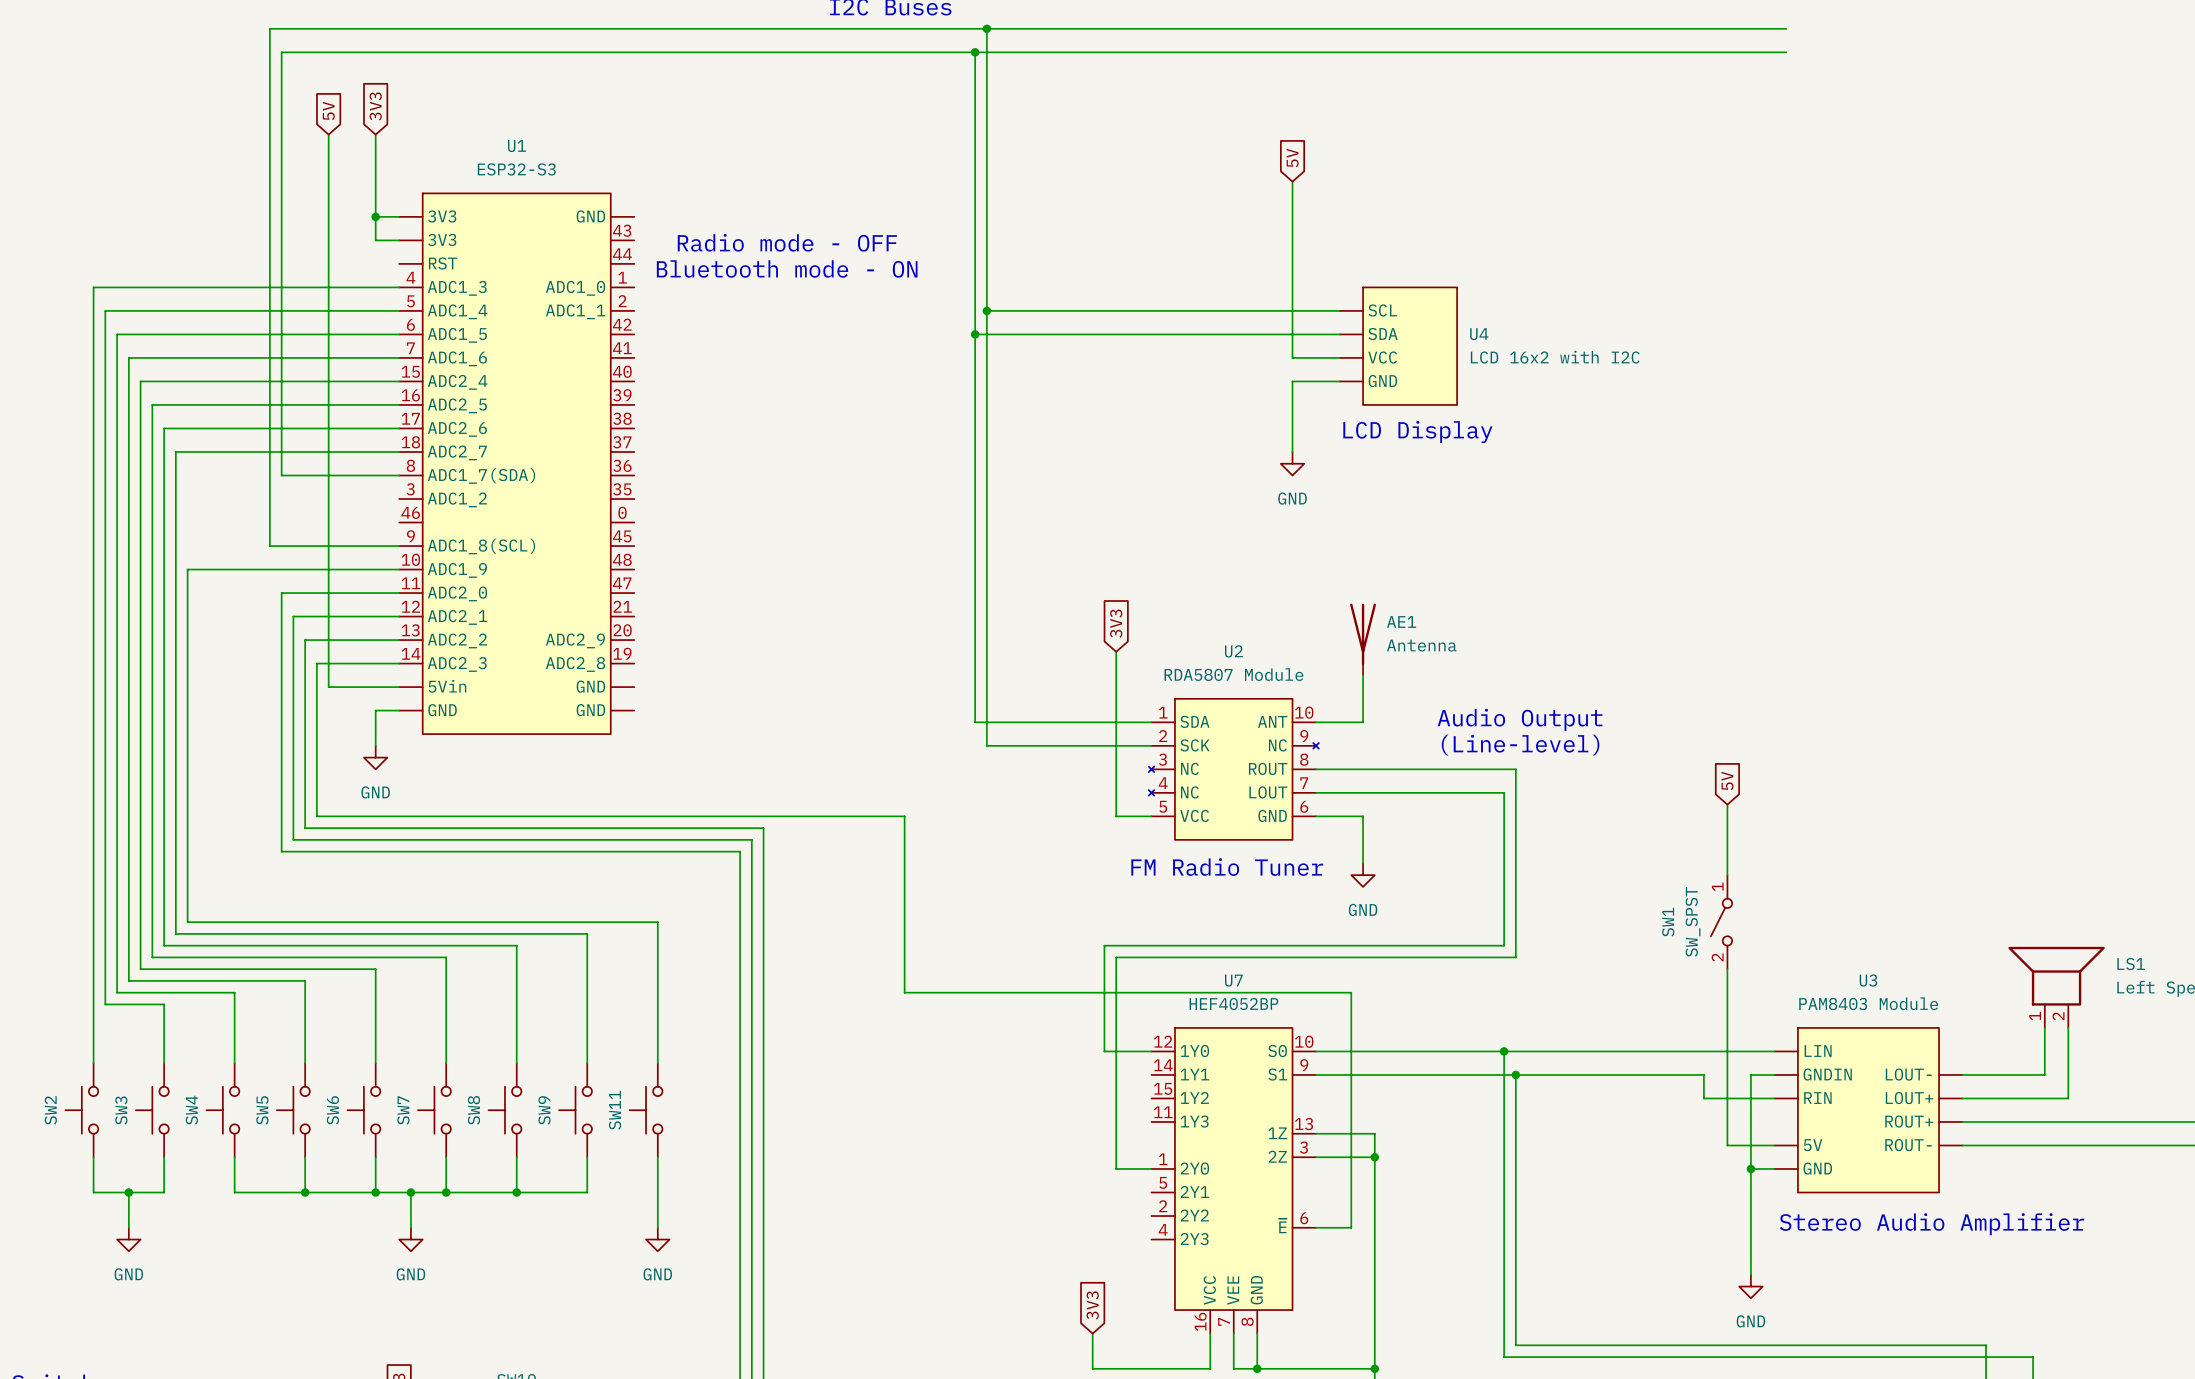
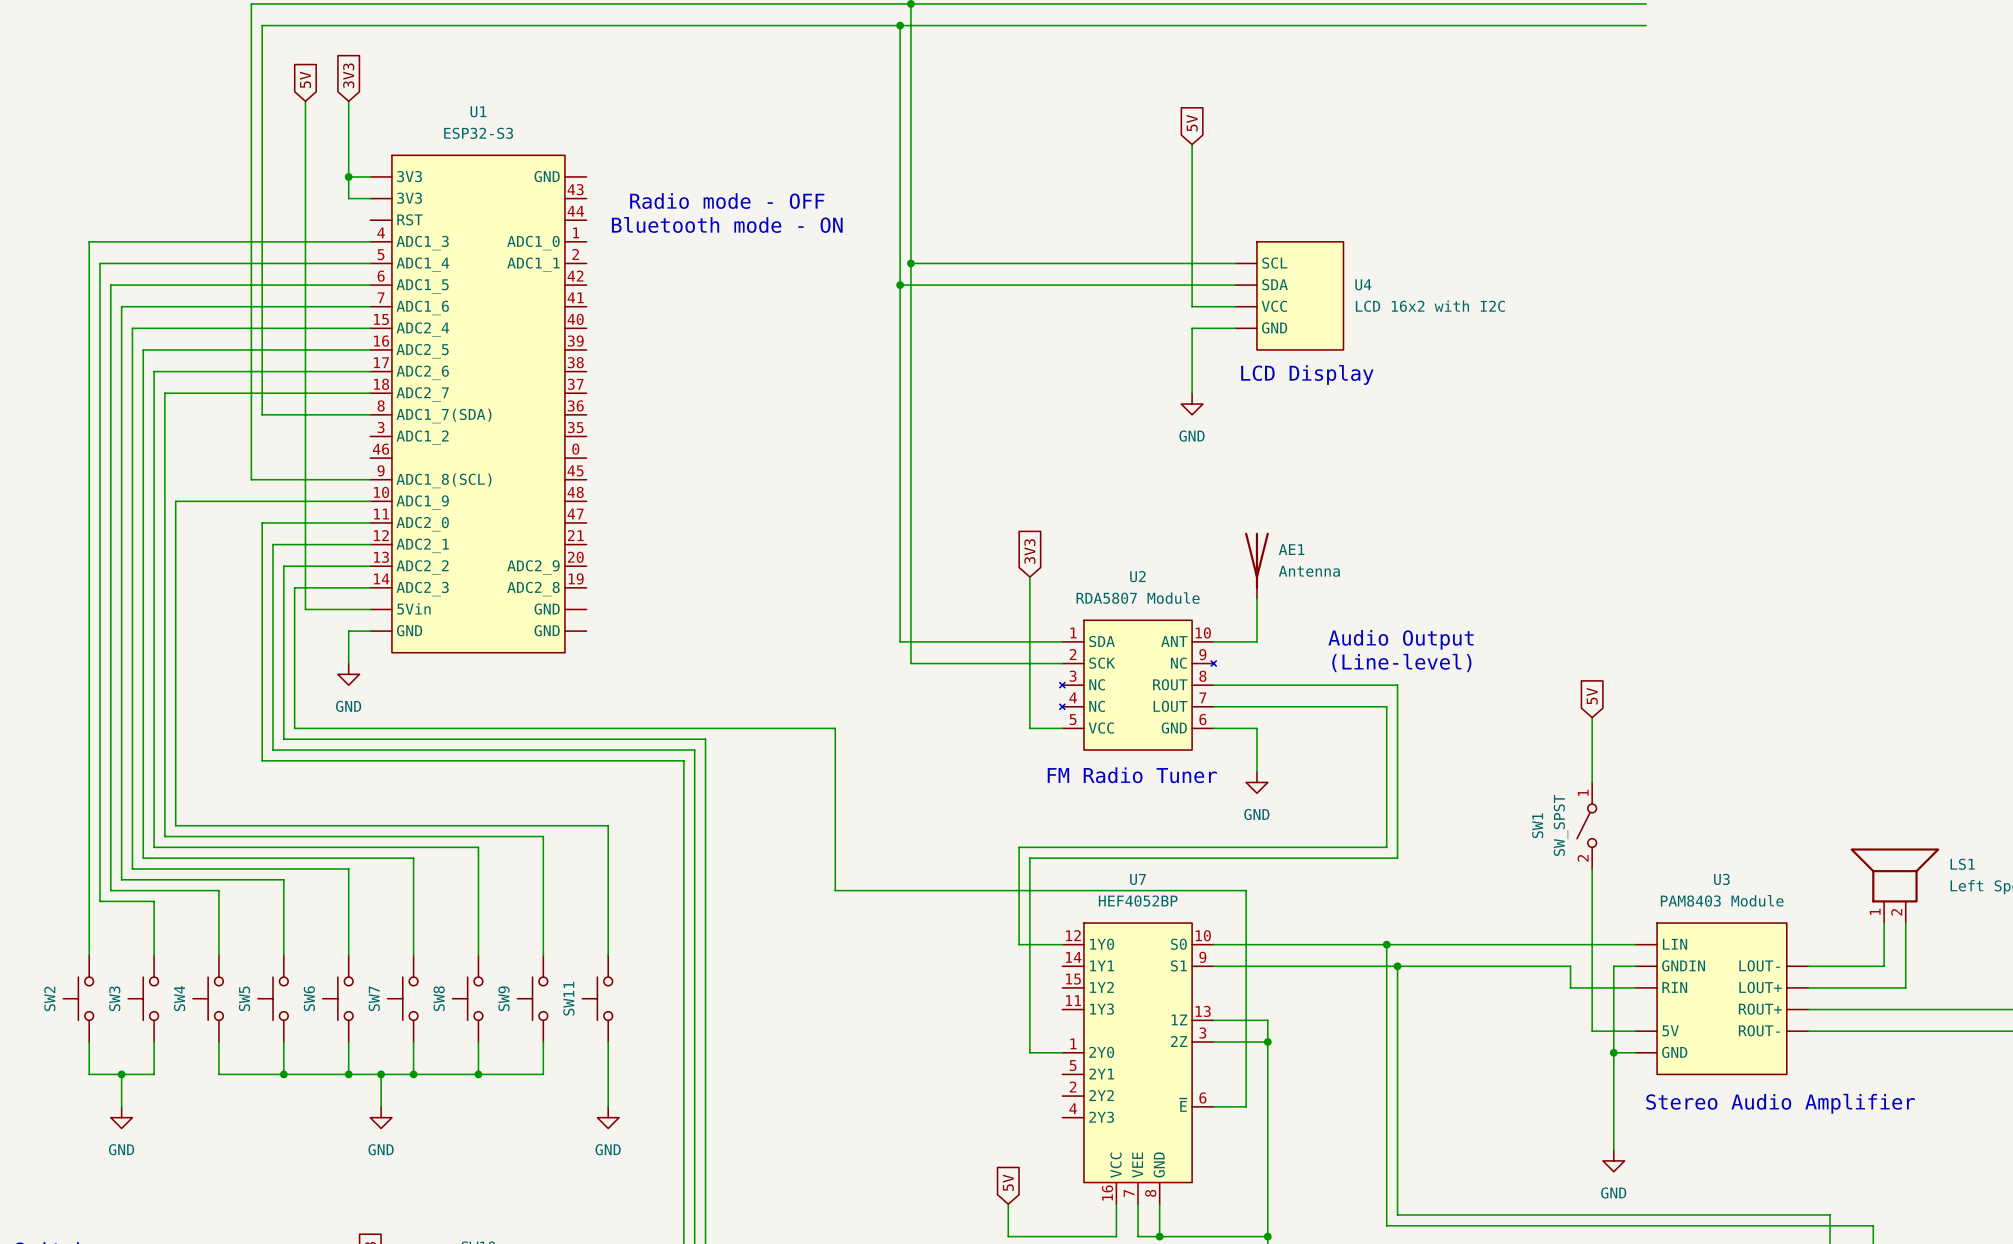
global label: 3V3 (1092, 1305) -> 5V (1008, 1182)

